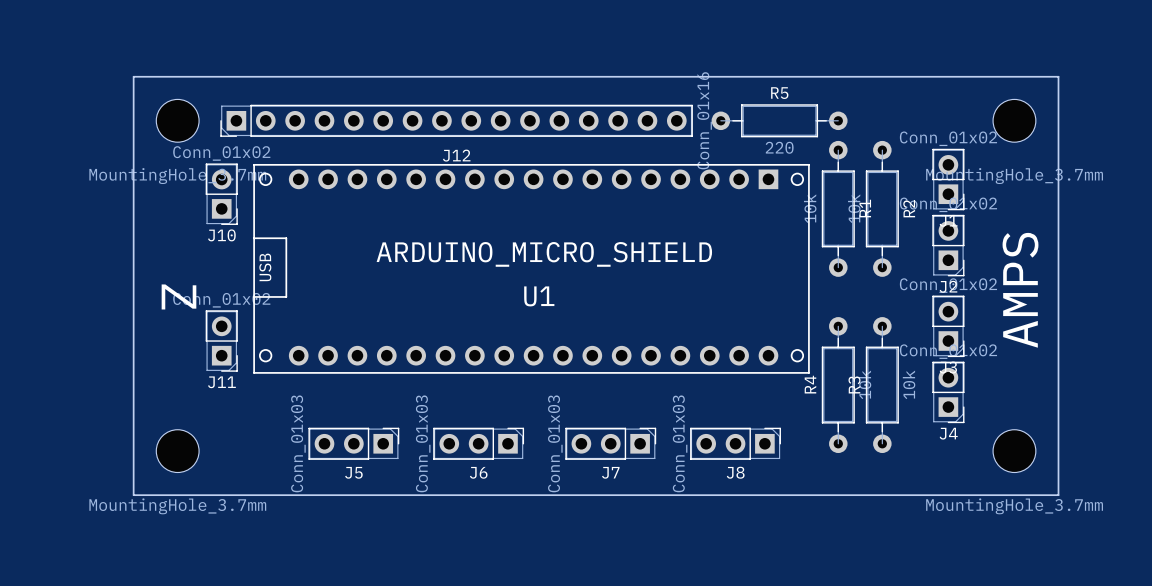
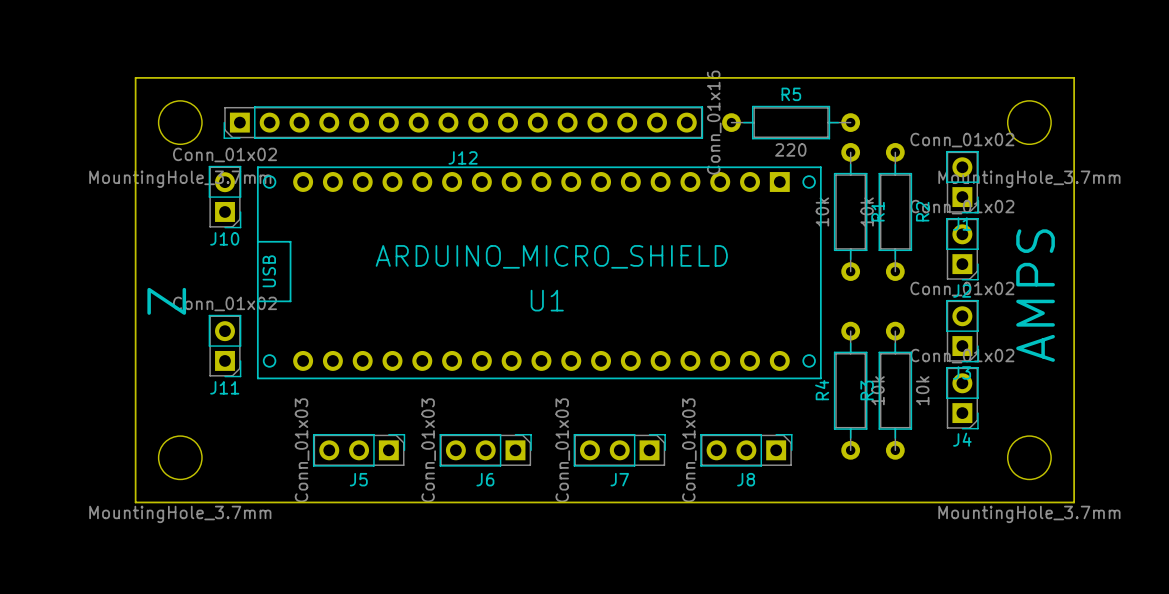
text position: Z (178, 296) -> Z (166, 301)

